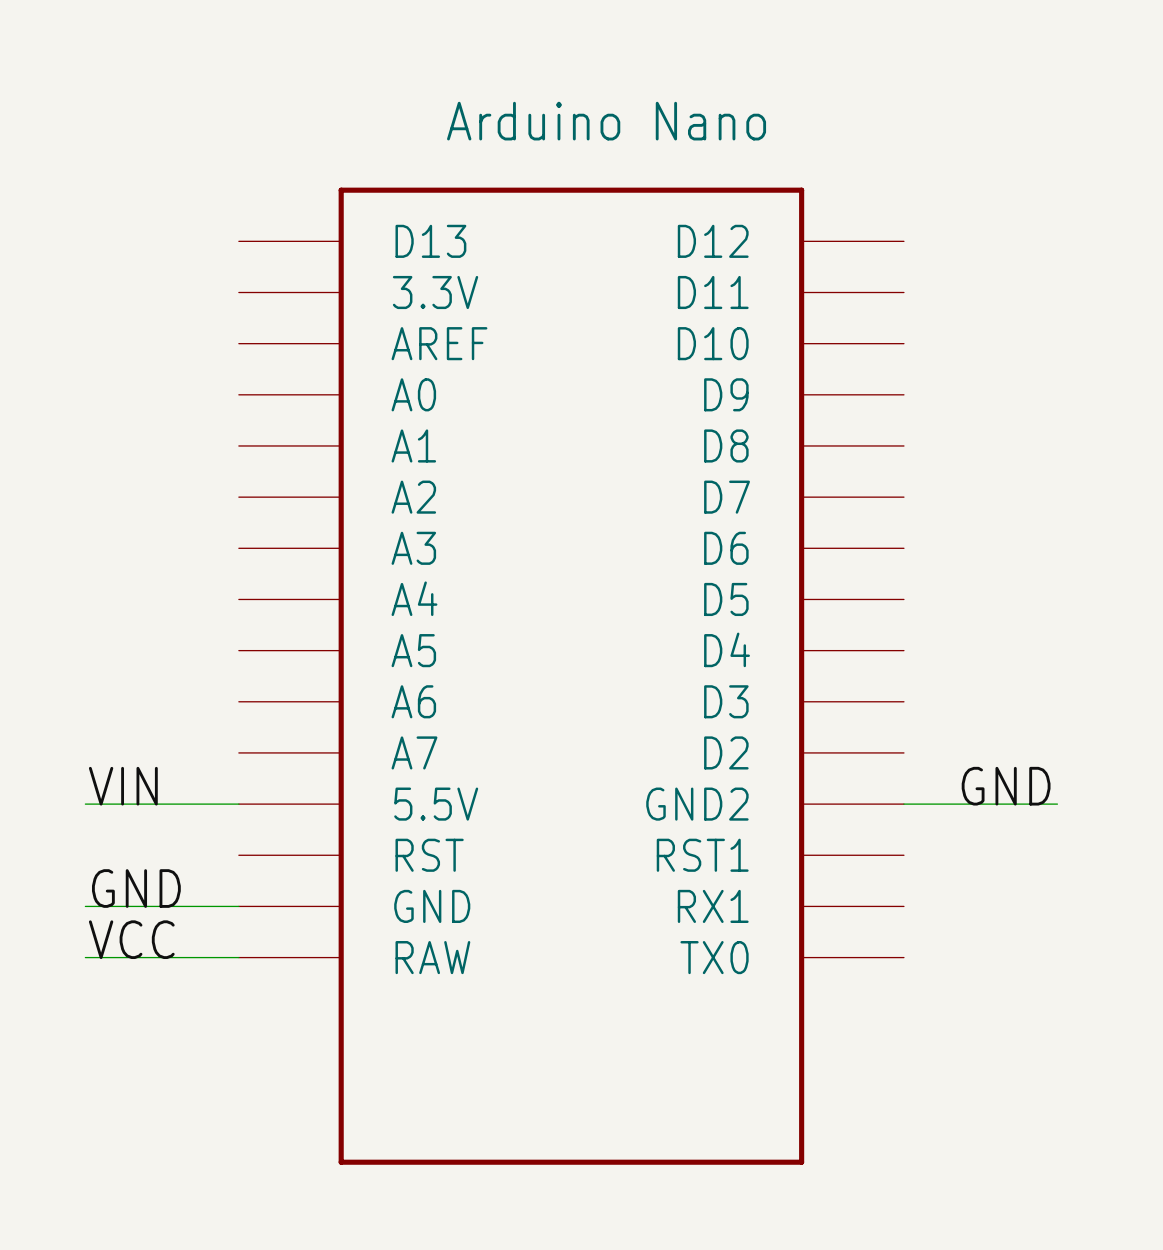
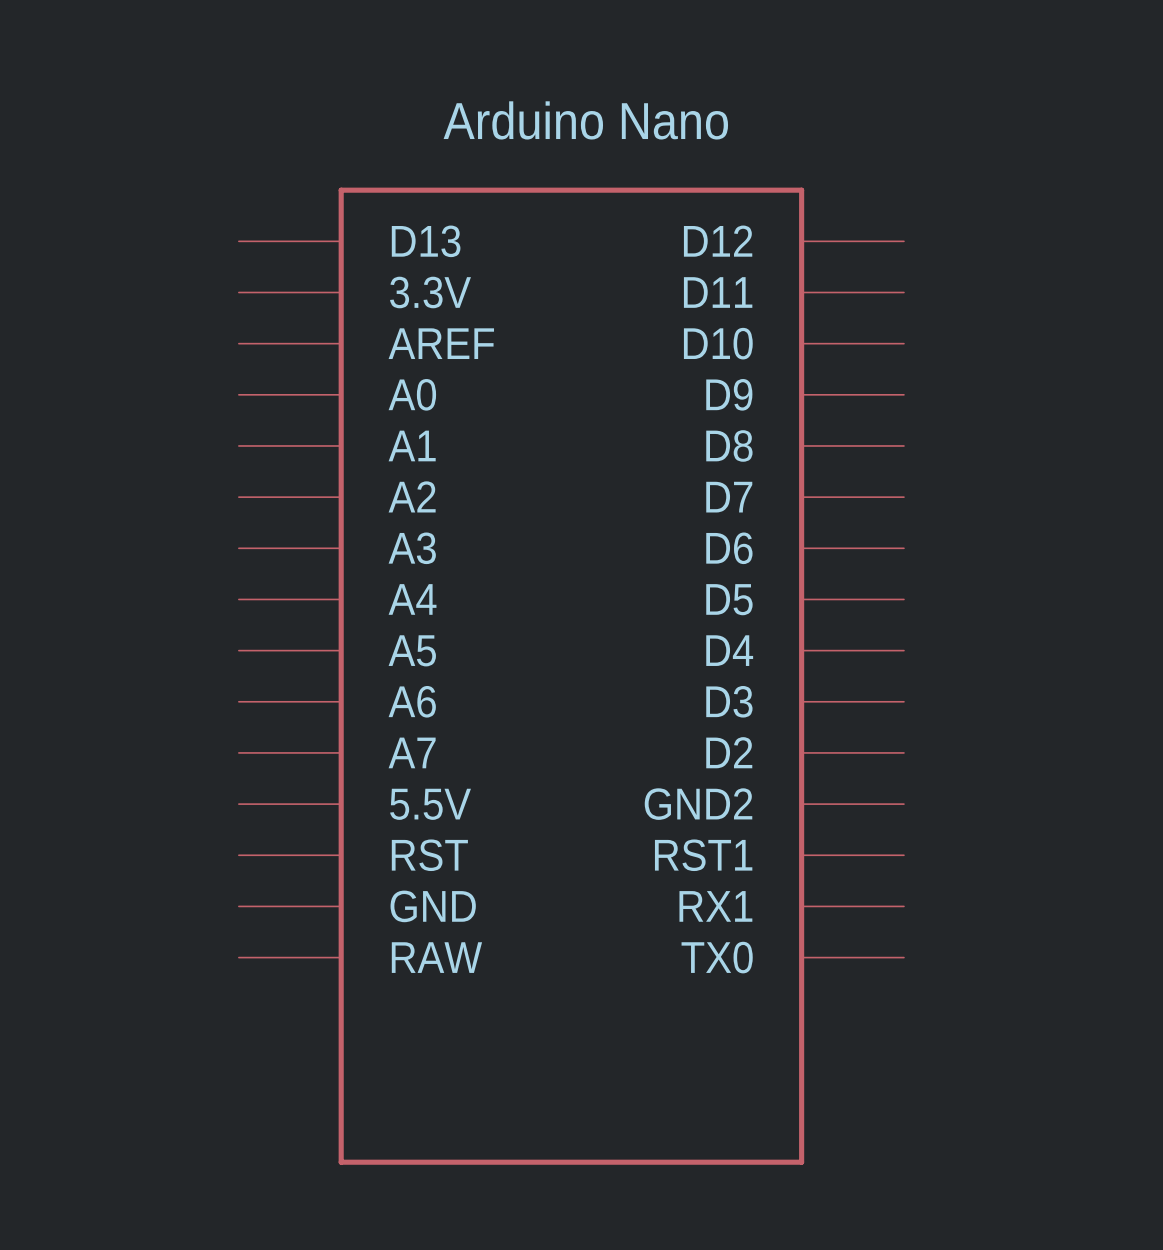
label: VIN (123, 786) -> none
label: GND (1006, 786) -> none
wire: (85, 804) (238, 804) -> none
wire: (903, 804) (1057, 804) -> none
label: GND (136, 888) -> none
wire: (85, 906) (238, 906) -> none
label: VCC (131, 939) -> none
wire: (85, 957) (238, 957) -> none

